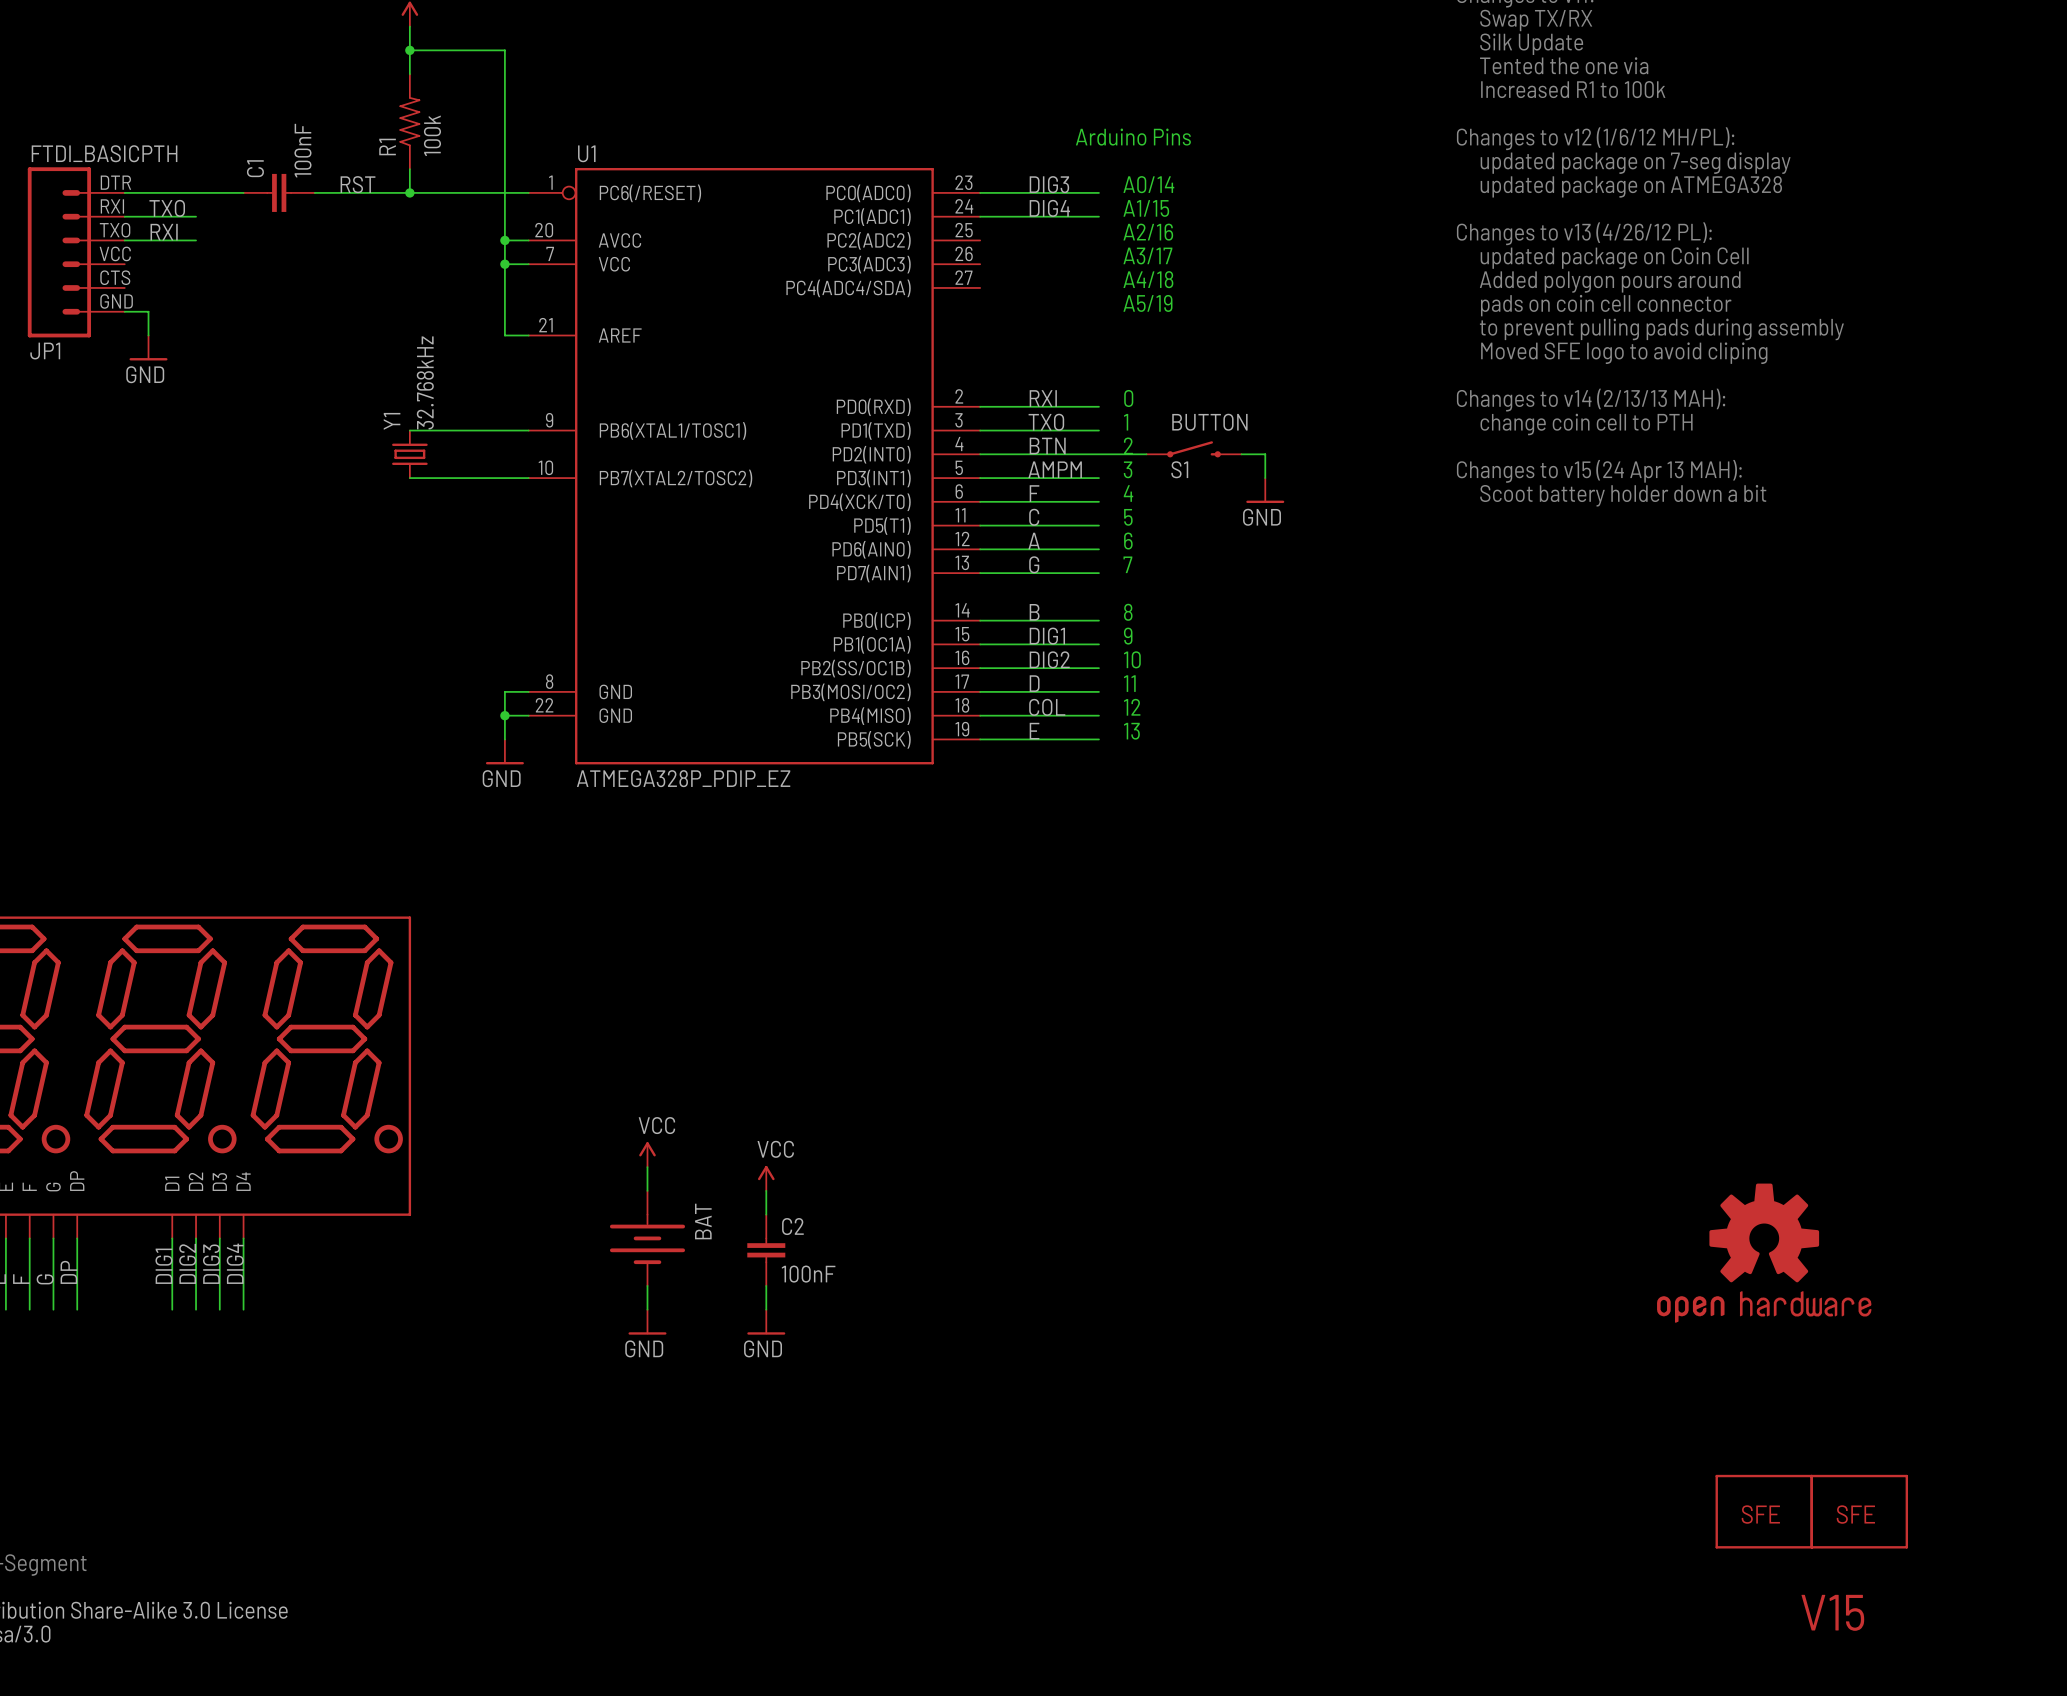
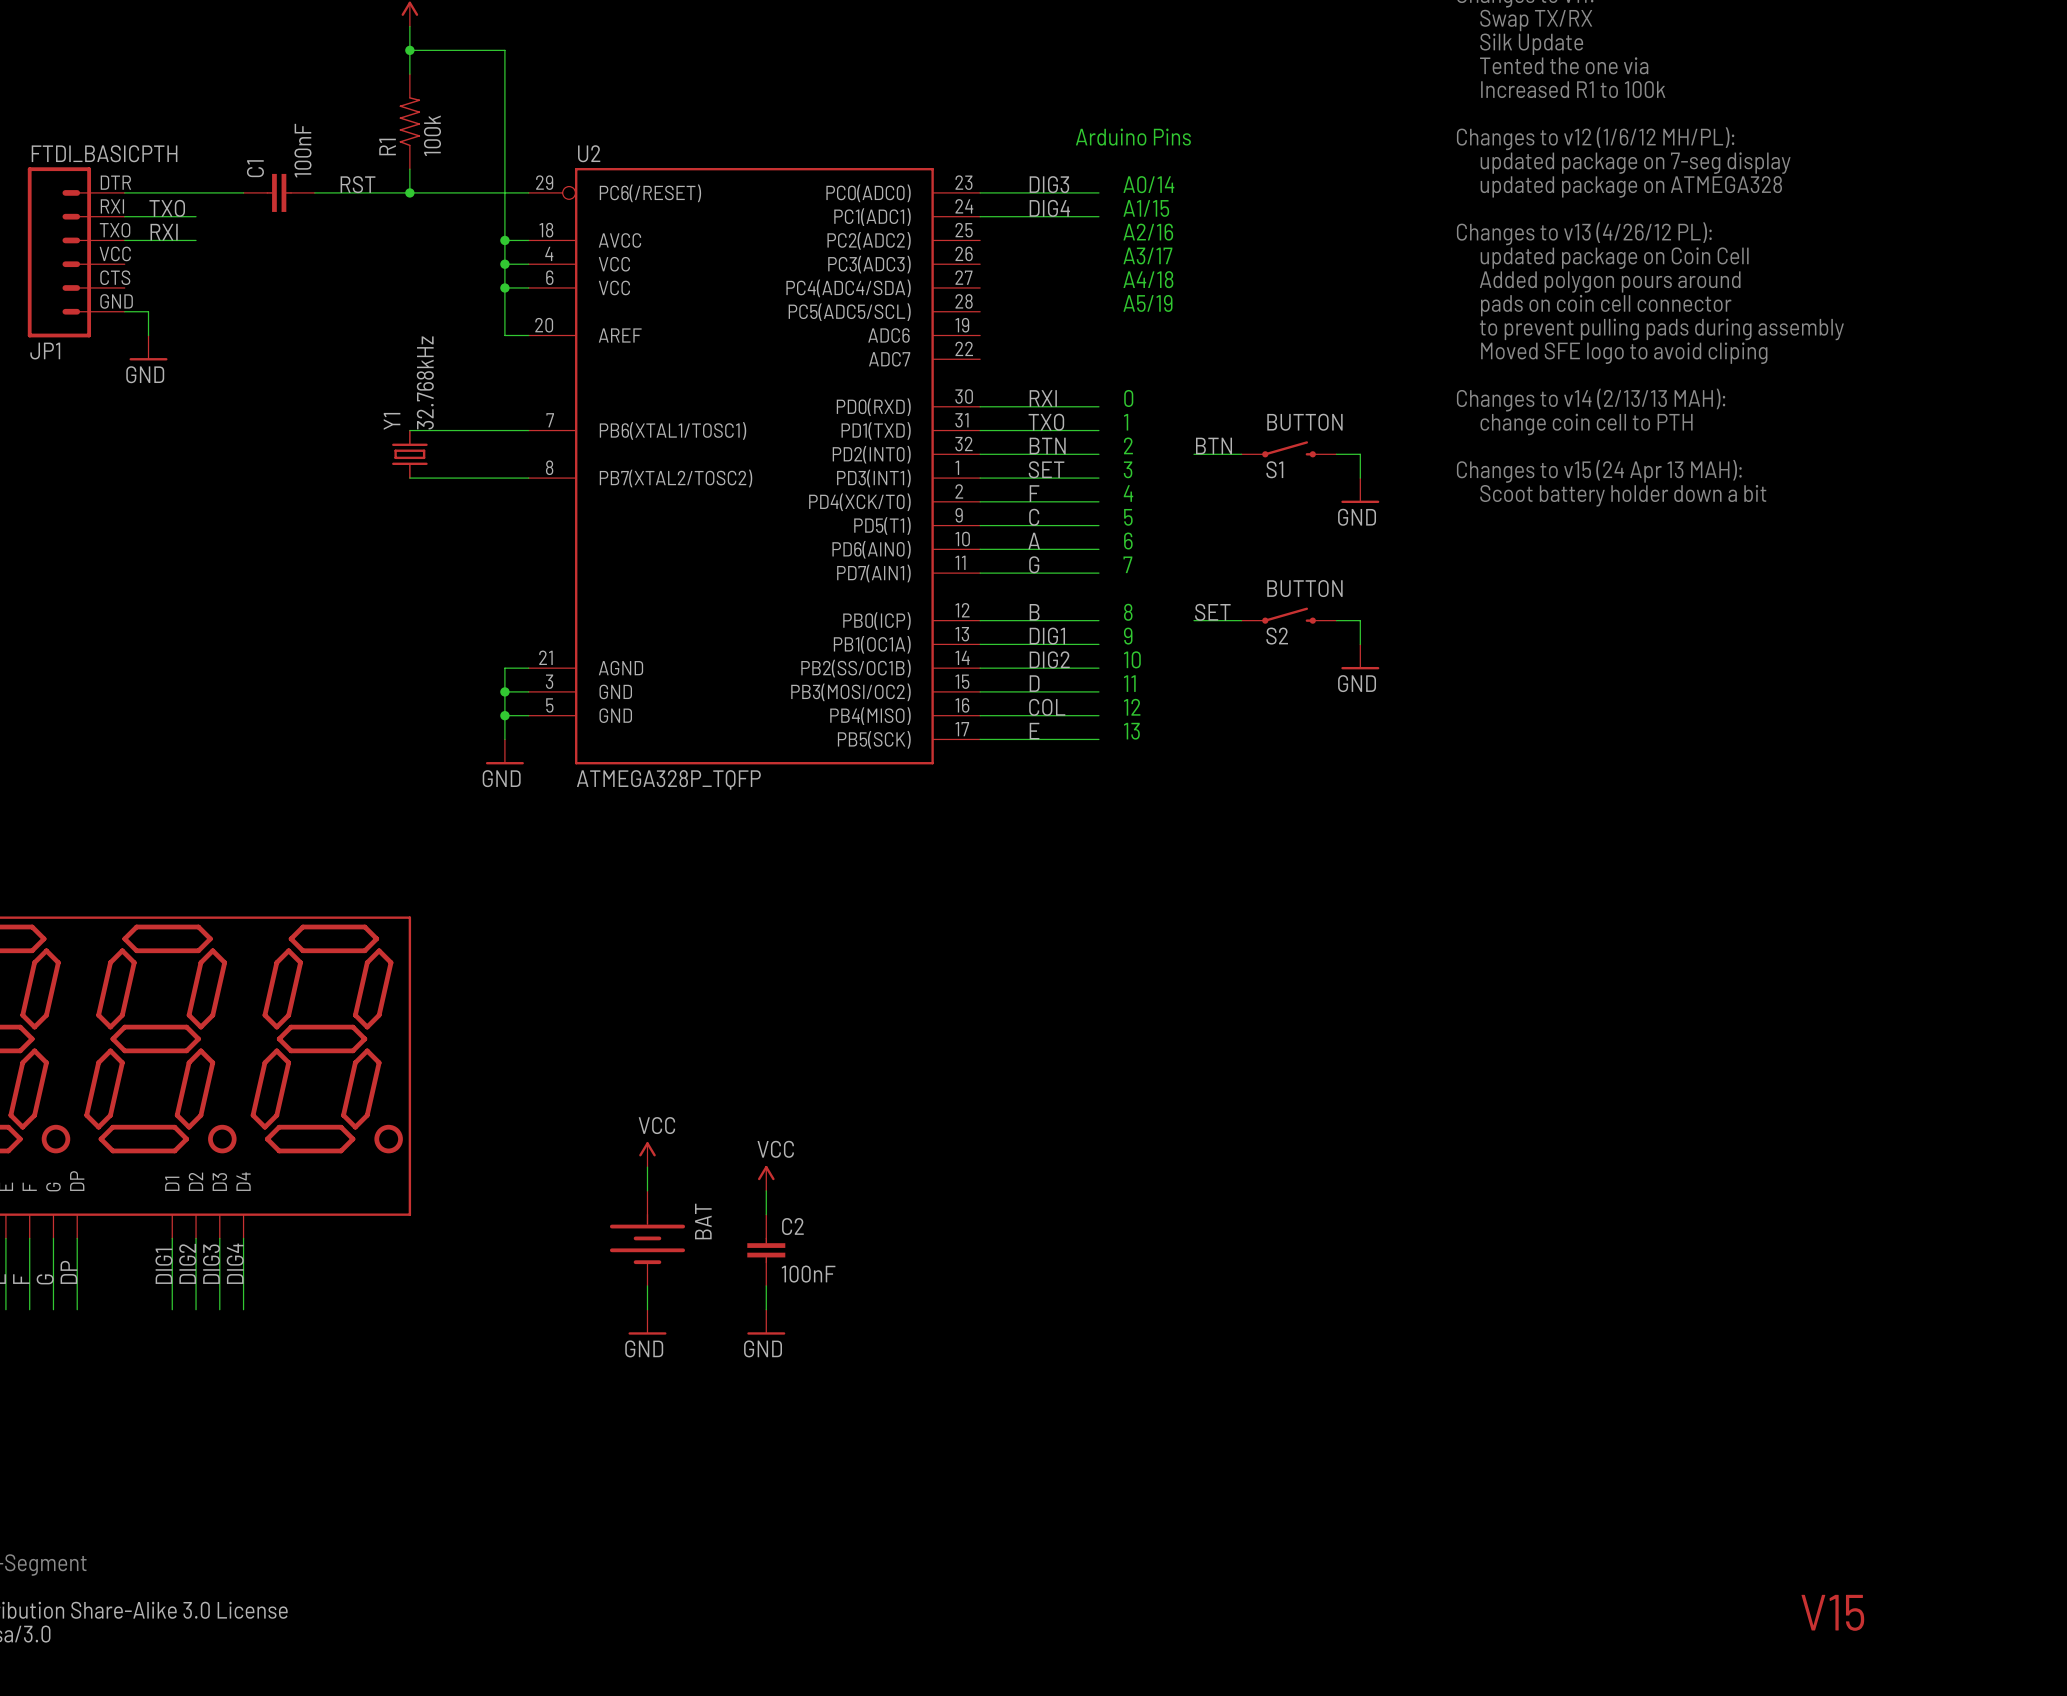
wire: none -> (504, 287) (528, 287)
junction: none -> (504, 287)
label: none -> BTN (1214, 445)
S1 position: (1193, 449) -> (1289, 449)
wire: (1098, 454) (1146, 454) -> (1193, 620) (1241, 620)
wire: none -> (1336, 454) (1360, 454) (1360, 478)
U1: ATMEGA328P_PDIP_EZ (754, 466) -> none
U2: none -> ATMEGA328P_TQFP (754, 466)
label: AMPM (1055, 469) -> SET (1046, 469)
power symbol position: GND (1265, 490) -> GND (1360, 490)
label: none -> SET (1212, 612)
S2: none -> BUTTON (1289, 615)
wire: none -> (1336, 620) (1360, 620) (1360, 644)
power symbol: none -> GND (1360, 656)
wire: none -> (528, 668) (504, 668) (504, 691)
junction: none -> (504, 691)
part: (1764, 1253) -> none
part: (1764, 1511) -> none
part: (1859, 1511) -> none

